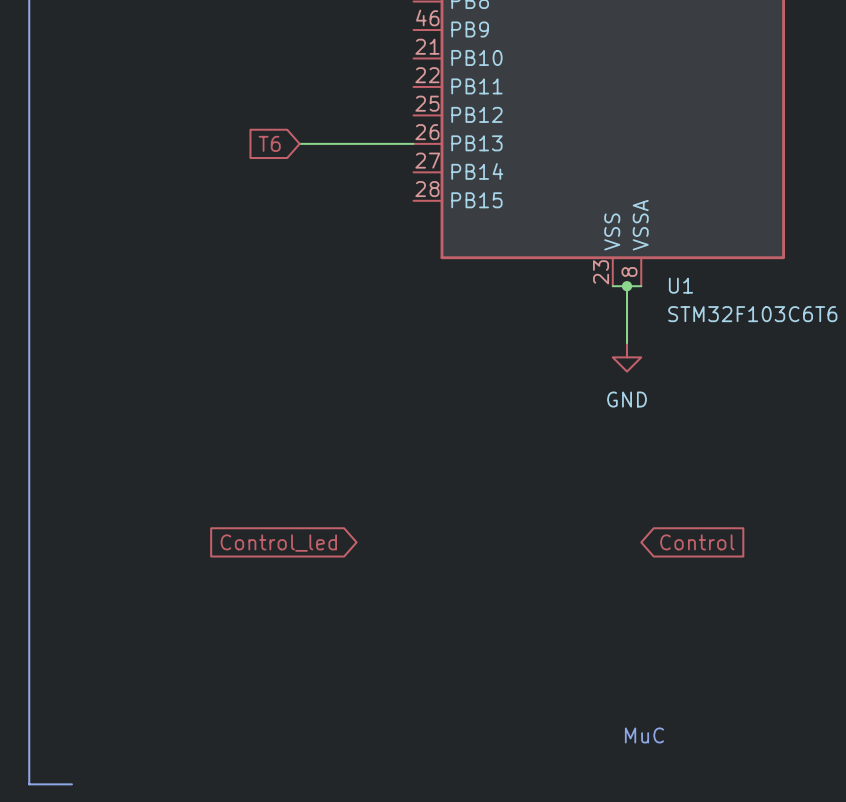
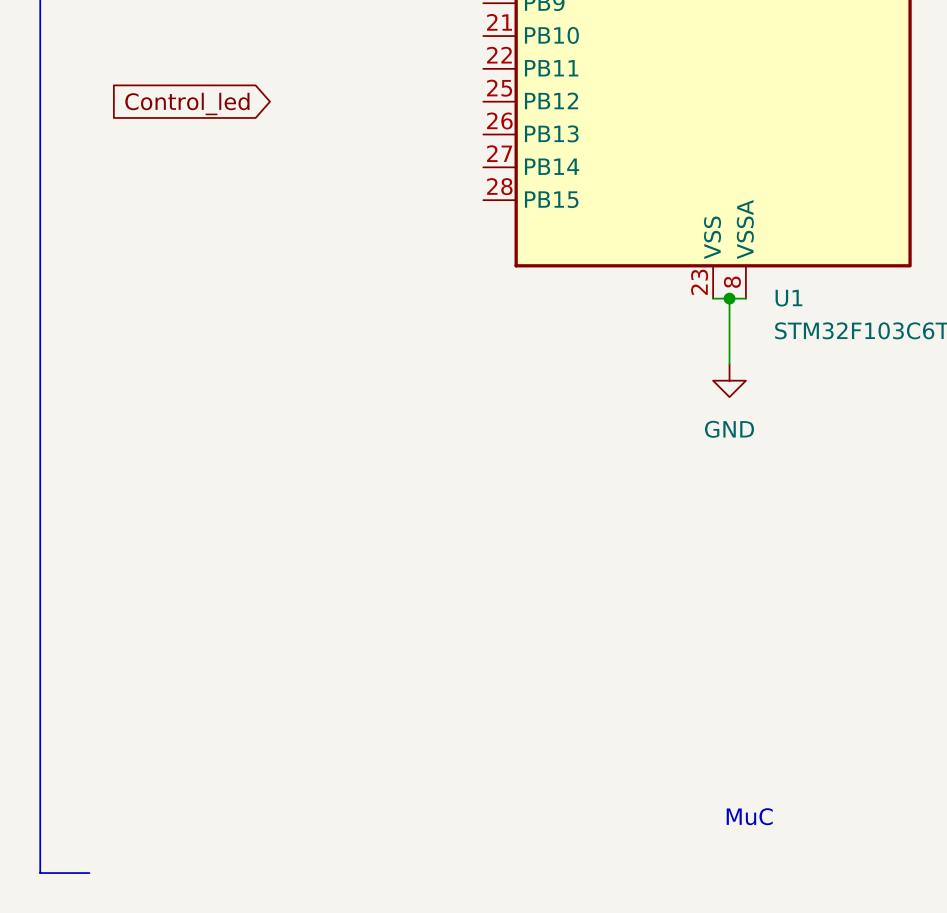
global label: none -> Control_led (187, 103)
global label: T6 (269, 143) -> none
wire: (299, 143) (413, 143) -> none
global label: Control (697, 542) -> none
global label: Control_led (278, 543) -> none

